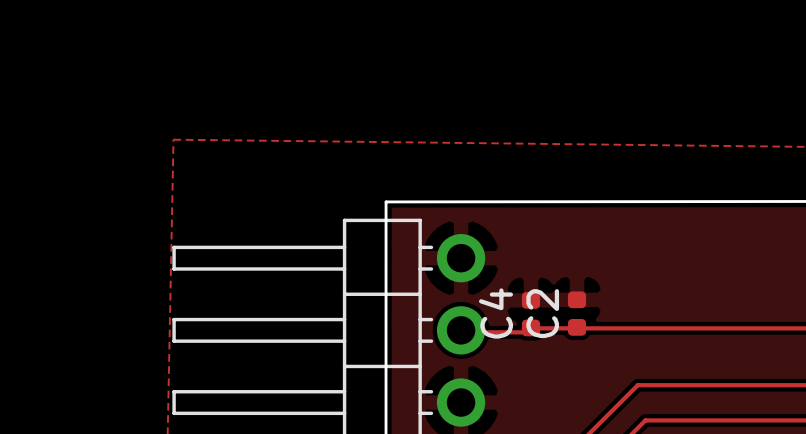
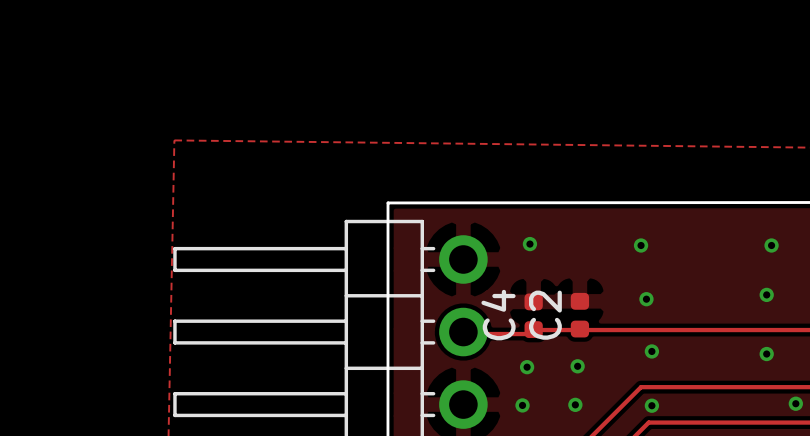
via: none -> (529, 244)
via: none -> (641, 245)
via: none -> (771, 245)
via: none -> (766, 294)
via: none -> (646, 299)
via: none -> (651, 351)
via: none -> (766, 354)
via: none -> (577, 366)
via: none -> (527, 367)
via: none -> (795, 403)
via: none -> (575, 404)
via: none -> (522, 405)
via: none -> (651, 405)

